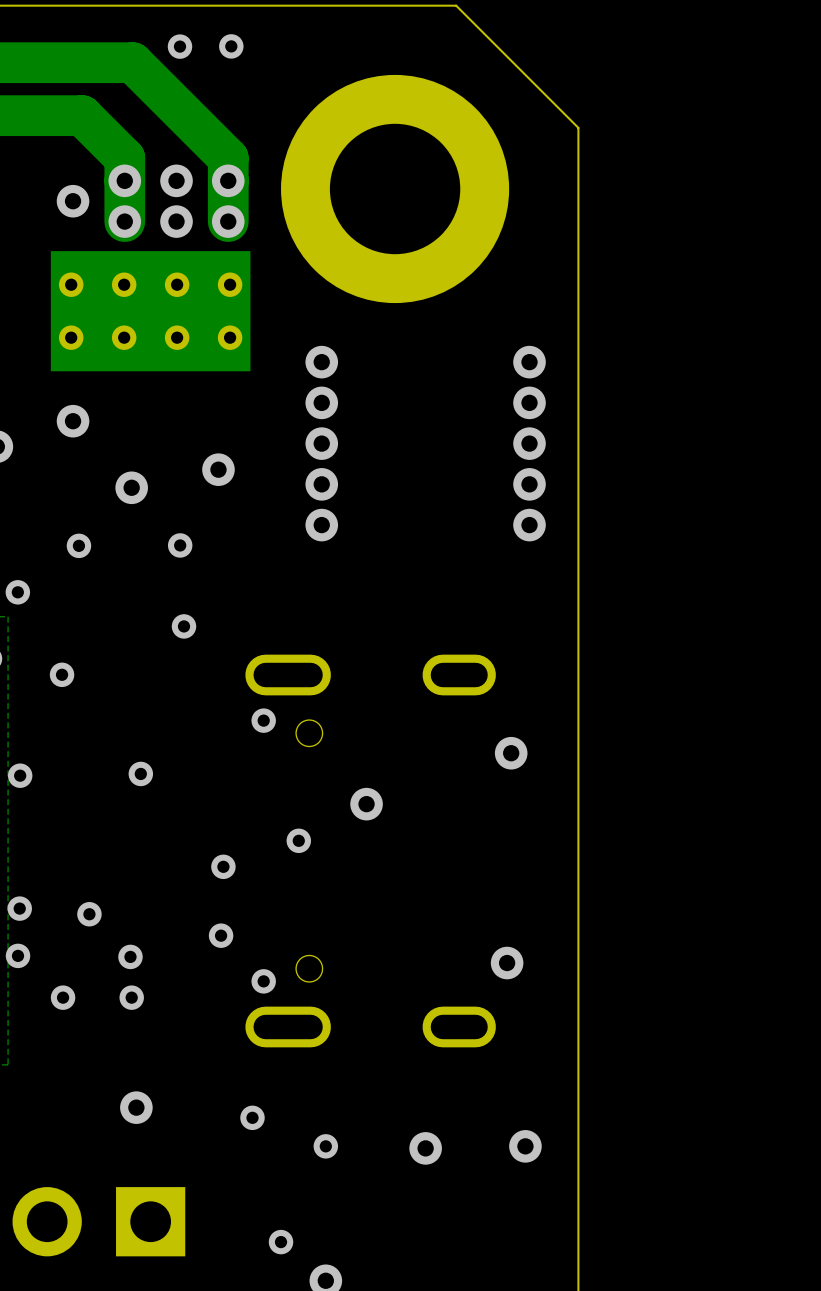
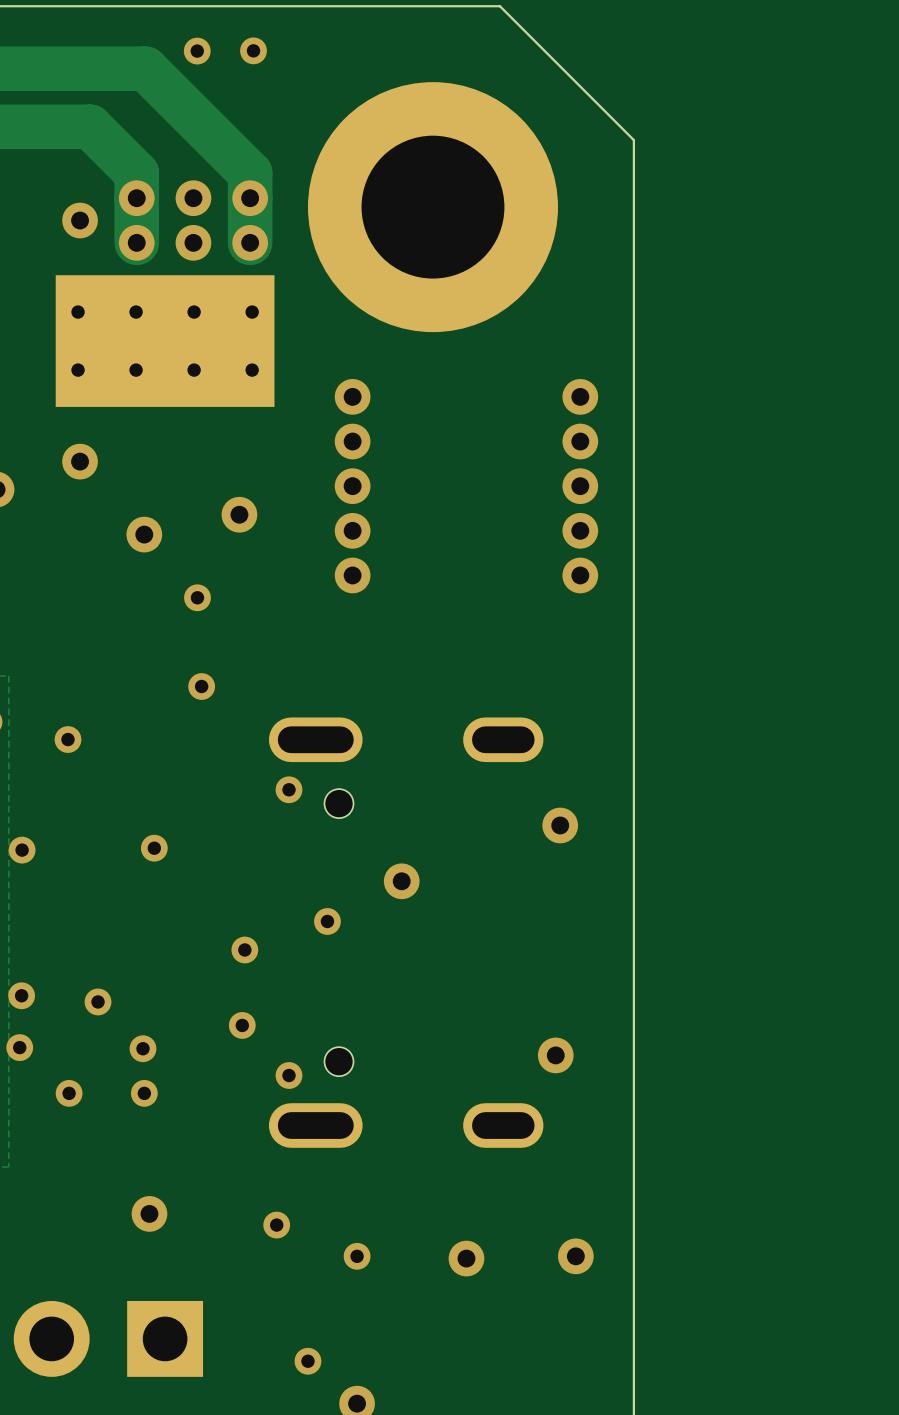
via: (78, 545) -> none
via: (17, 592) -> none

